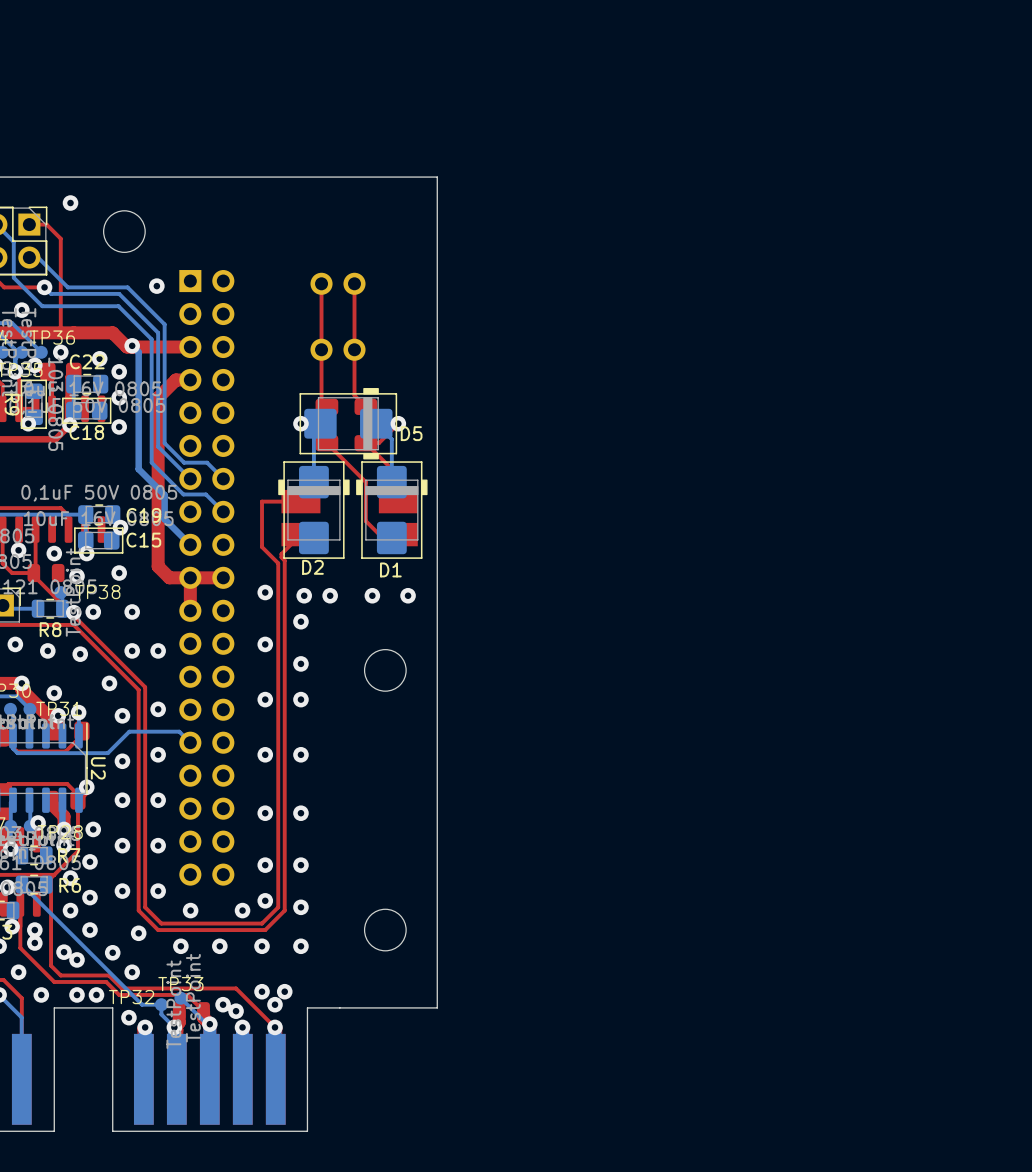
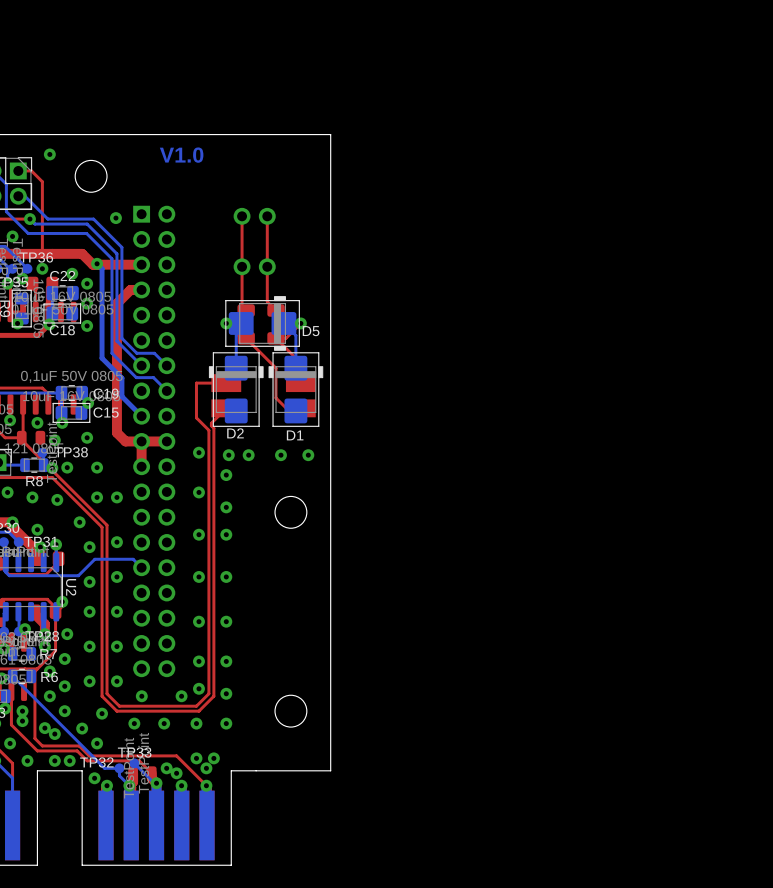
text: none -> V1.0 (181, 155)

